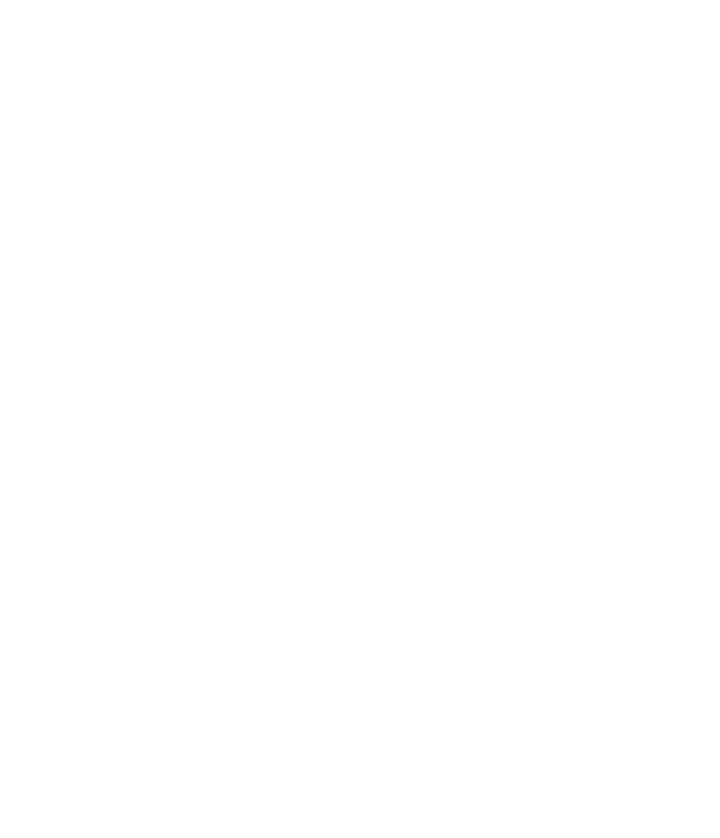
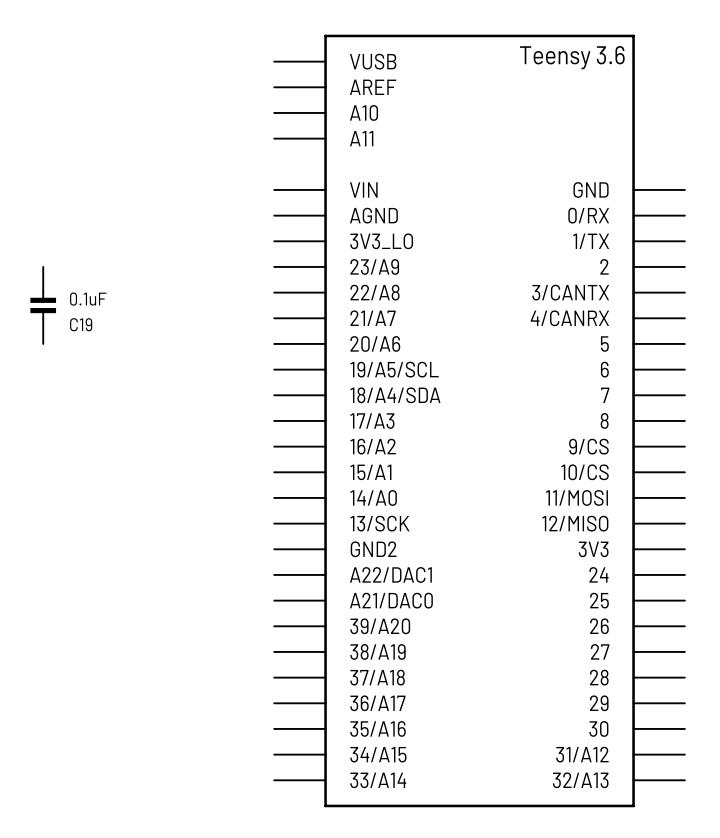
C19: none -> 0.1uF (43, 305)
part: none -> (479, 420)

